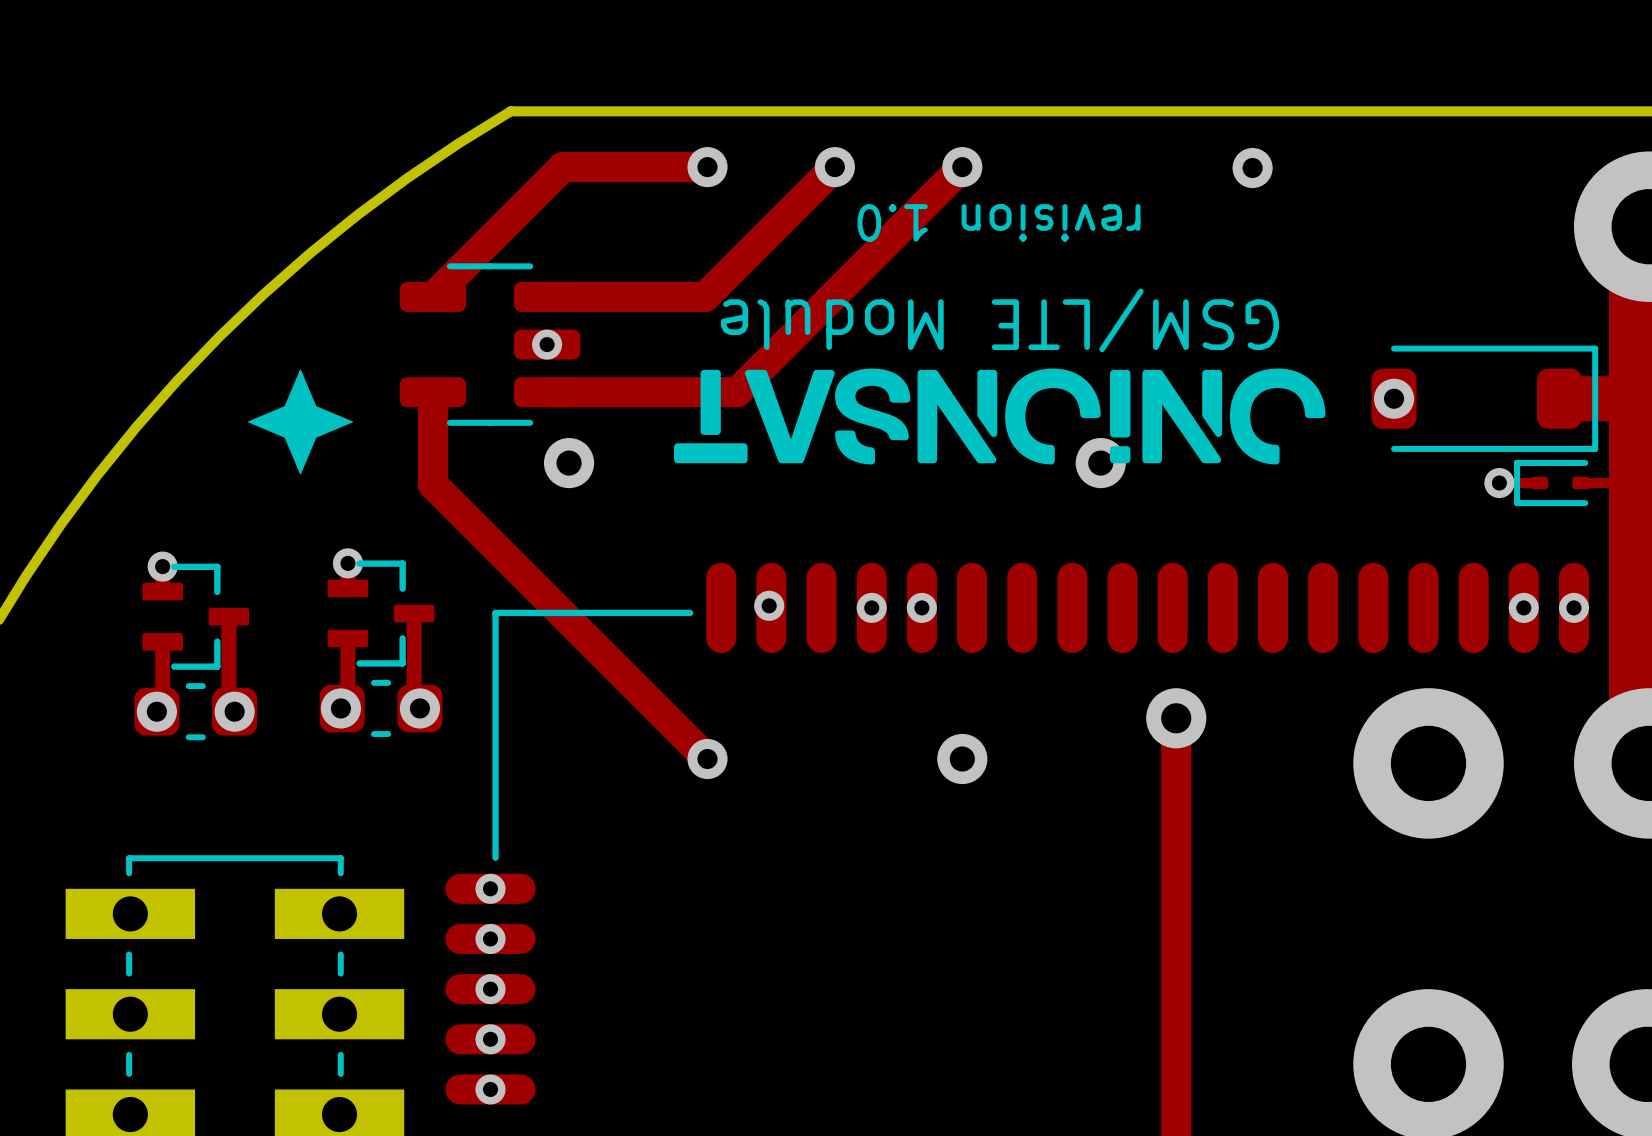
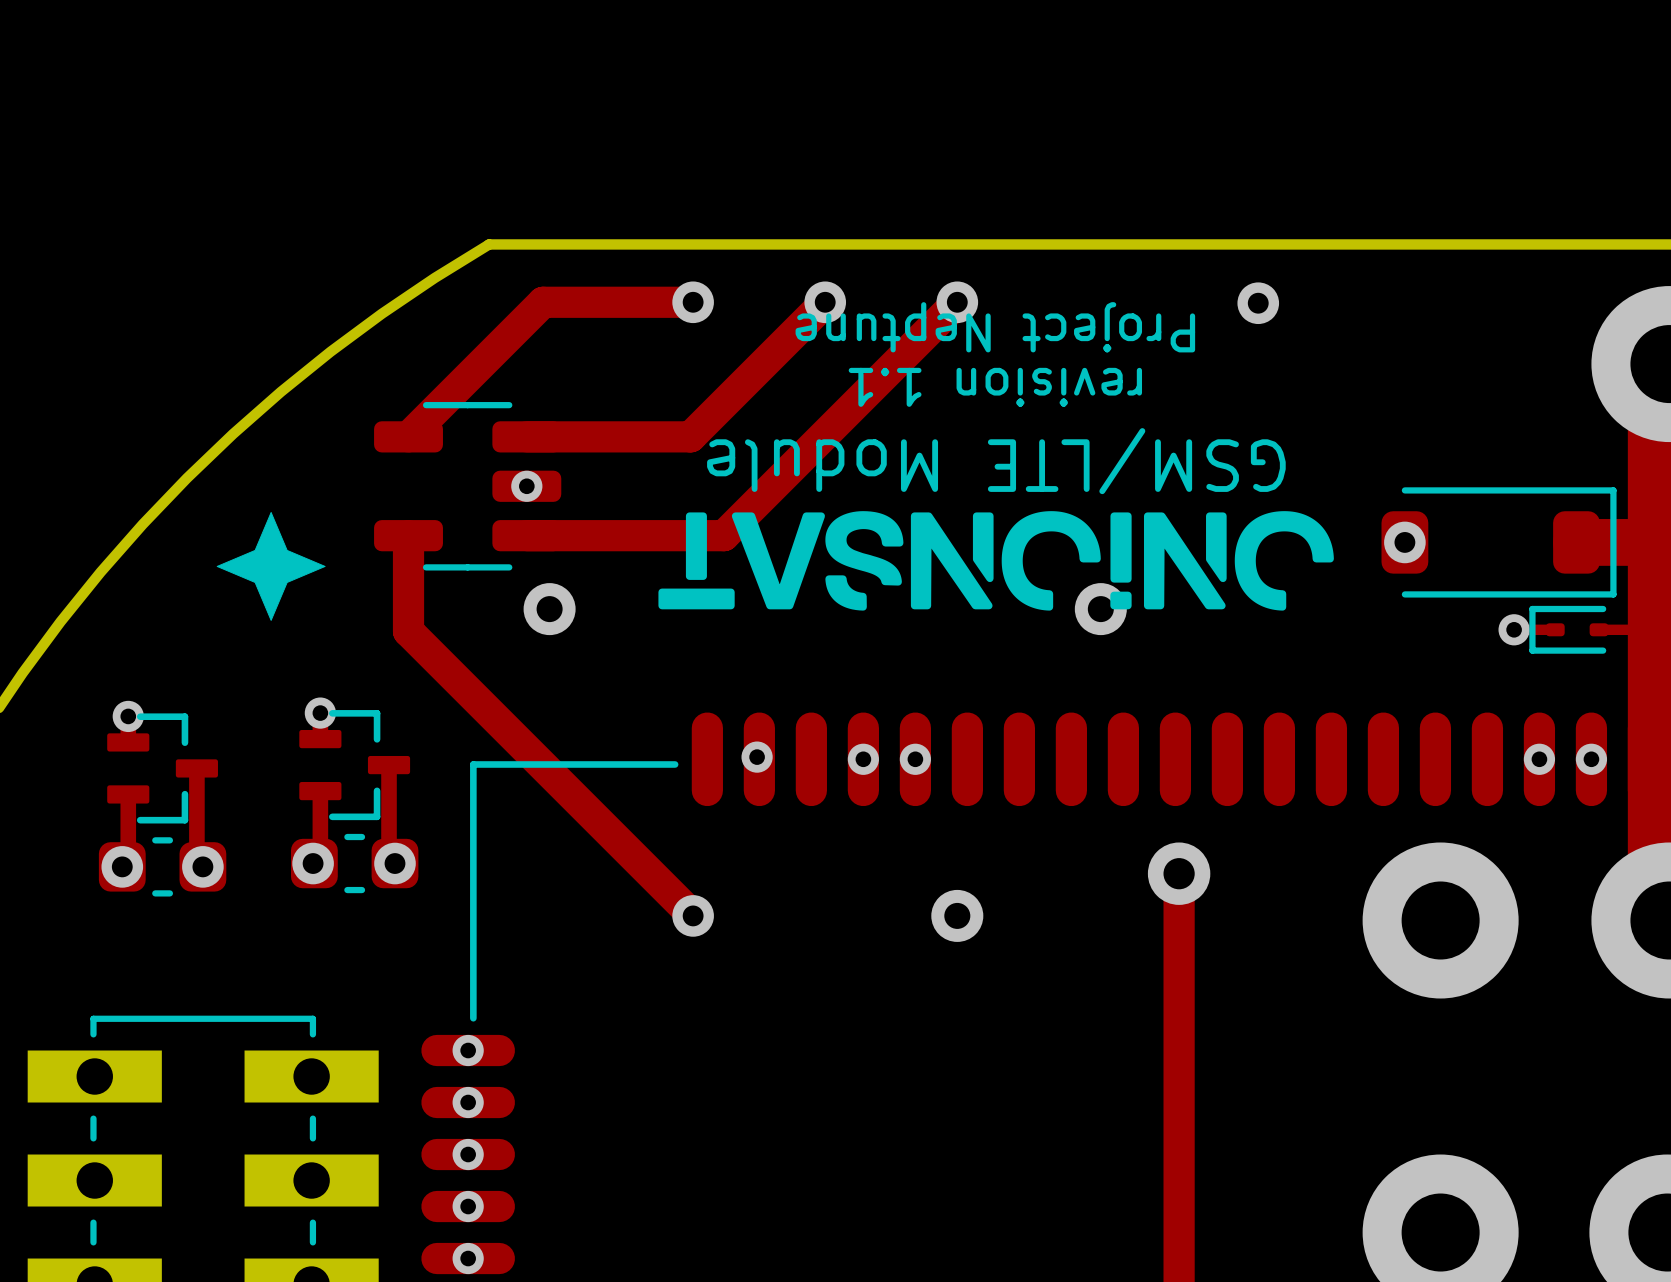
text: none -> Project Neptune (995, 327)
text: revision 1.0 (999, 222) -> revision 1.1 (995, 387)

